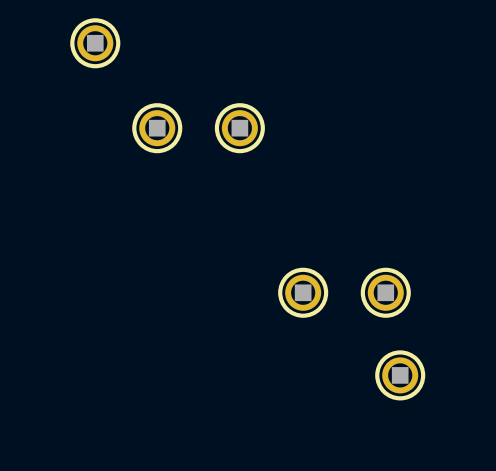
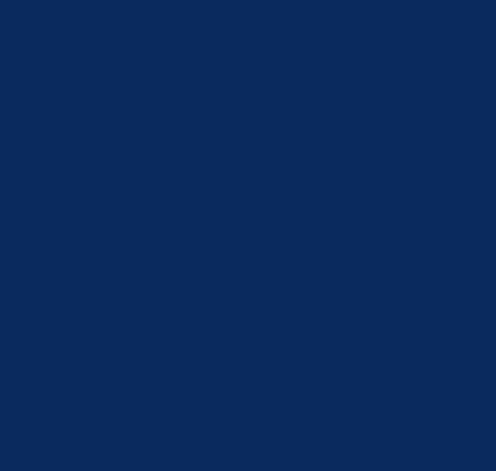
part: (95, 43) -> none
part: (157, 128) -> none
part: (239, 128) -> none
part: (303, 292) -> none
part: (385, 292) -> none
part: (400, 375) -> none

